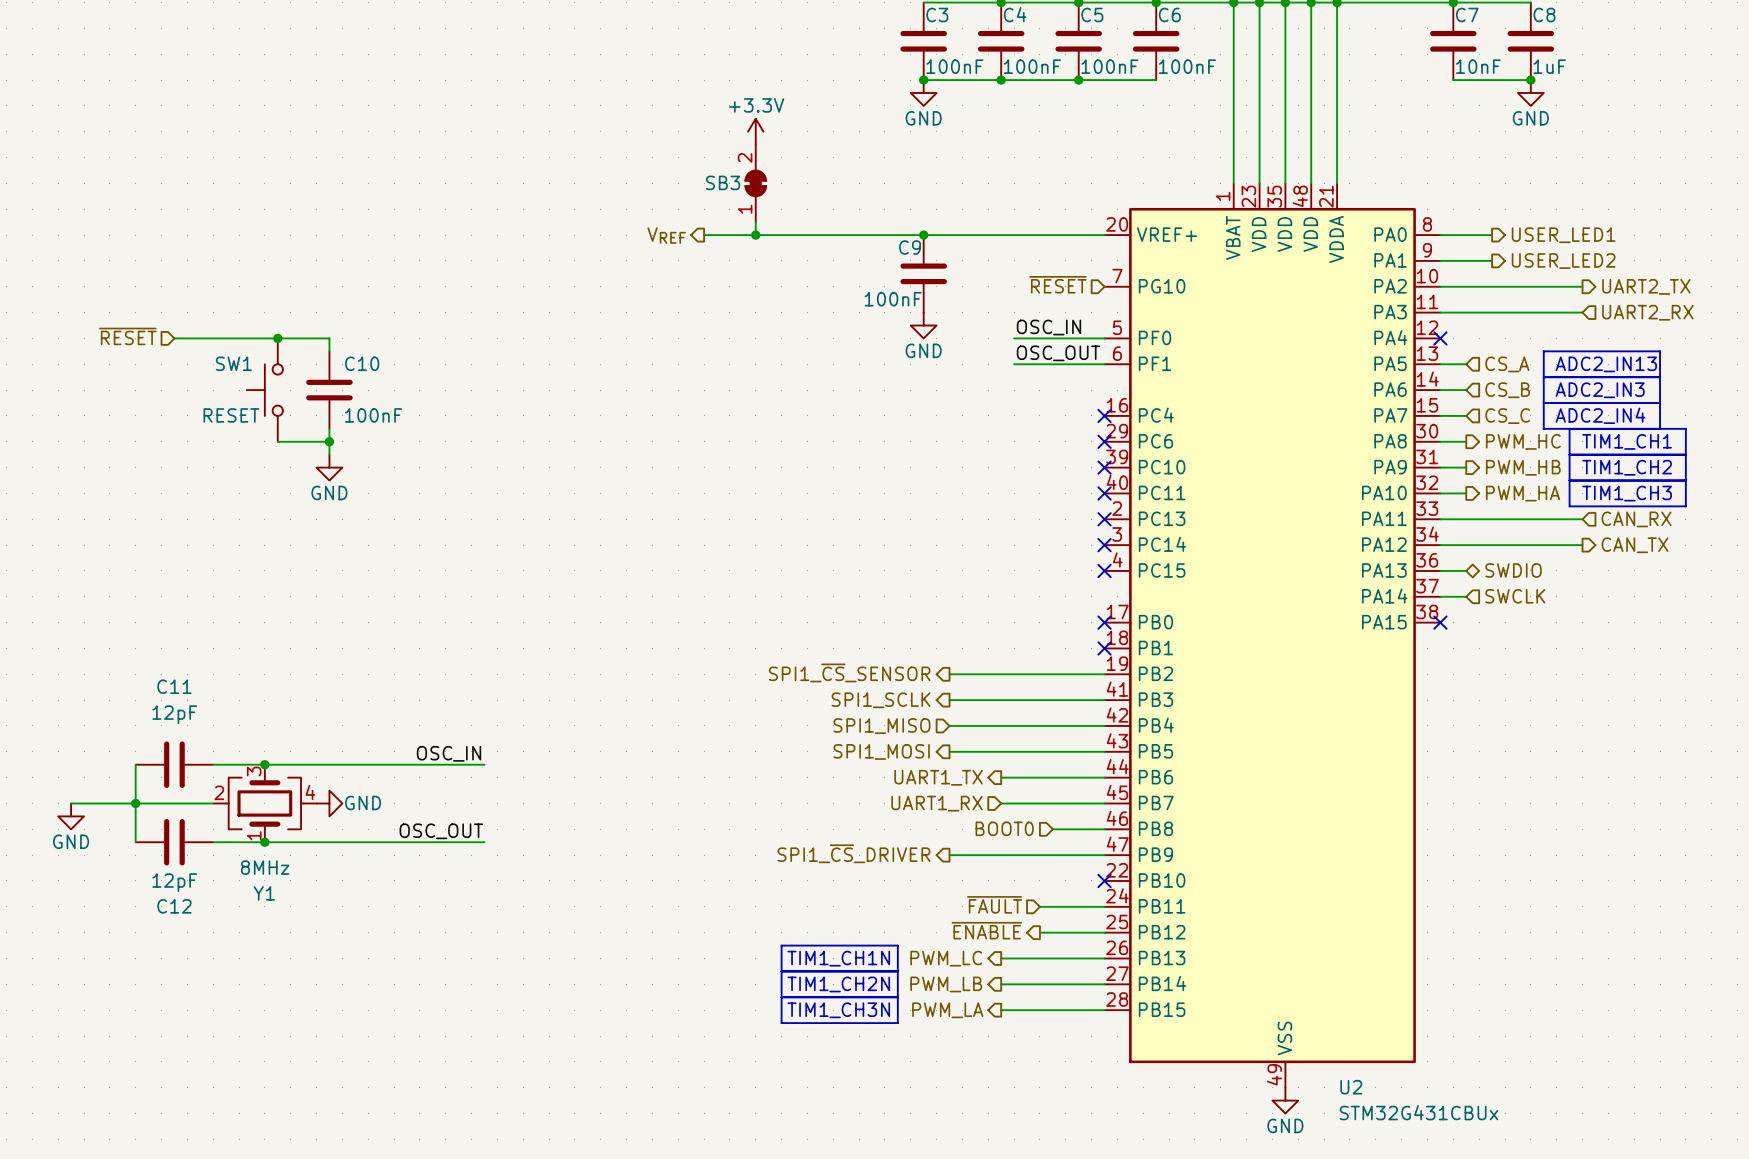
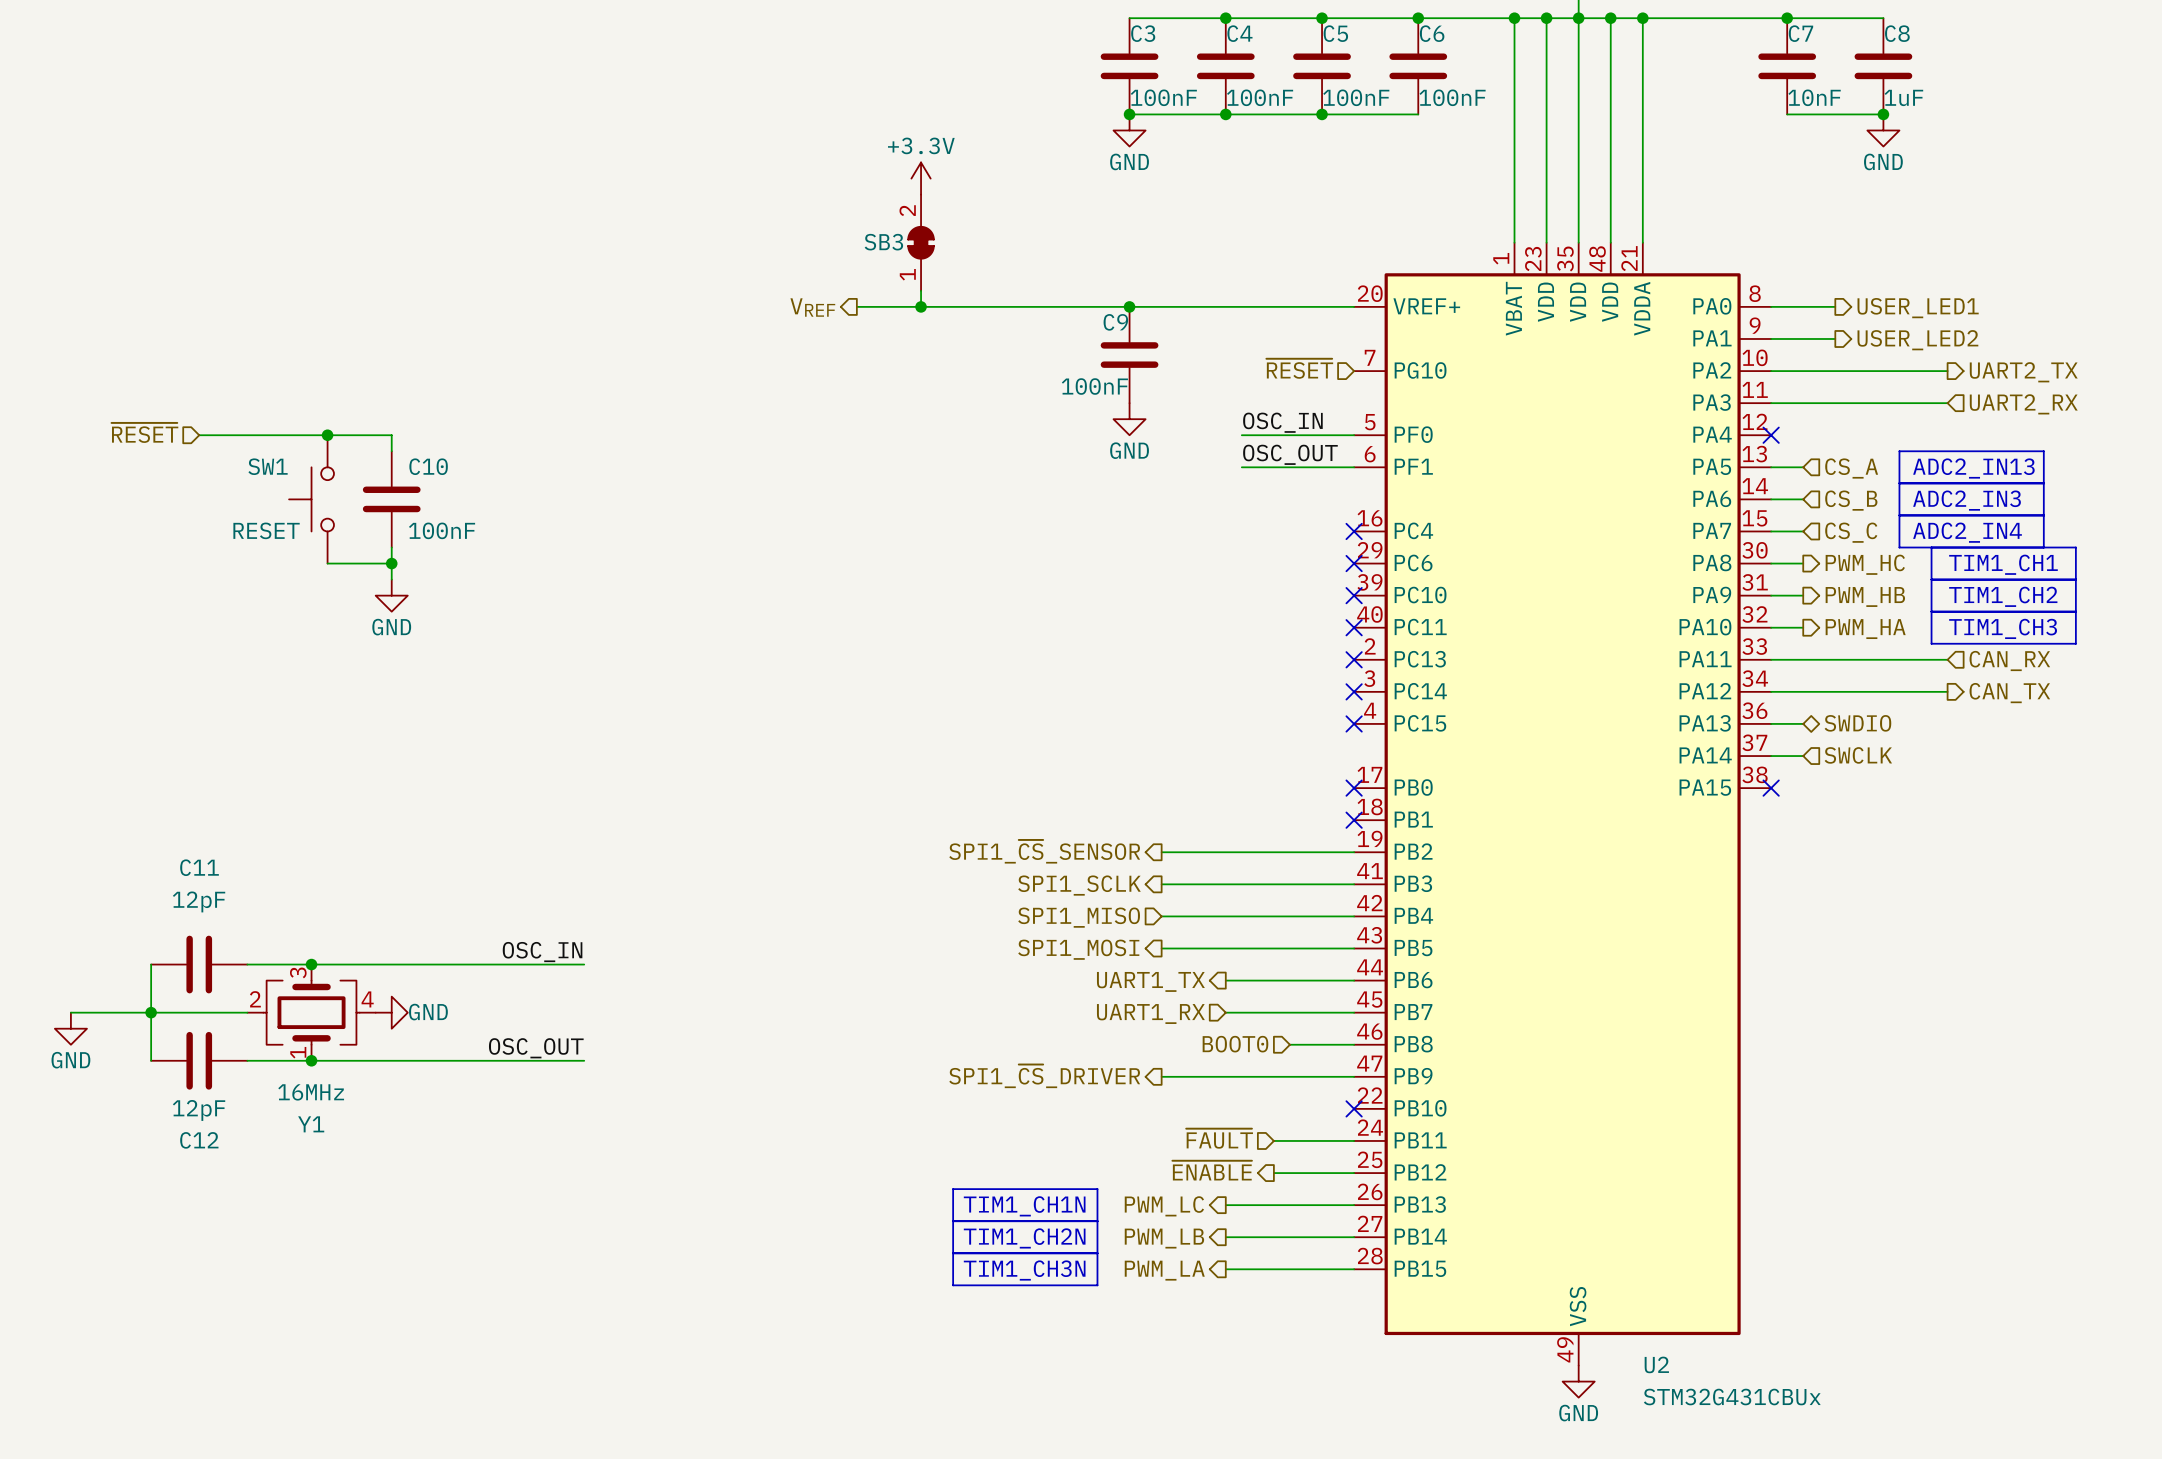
Y1 value: 8MHz (265, 867) -> 16MHz (311, 1092)

